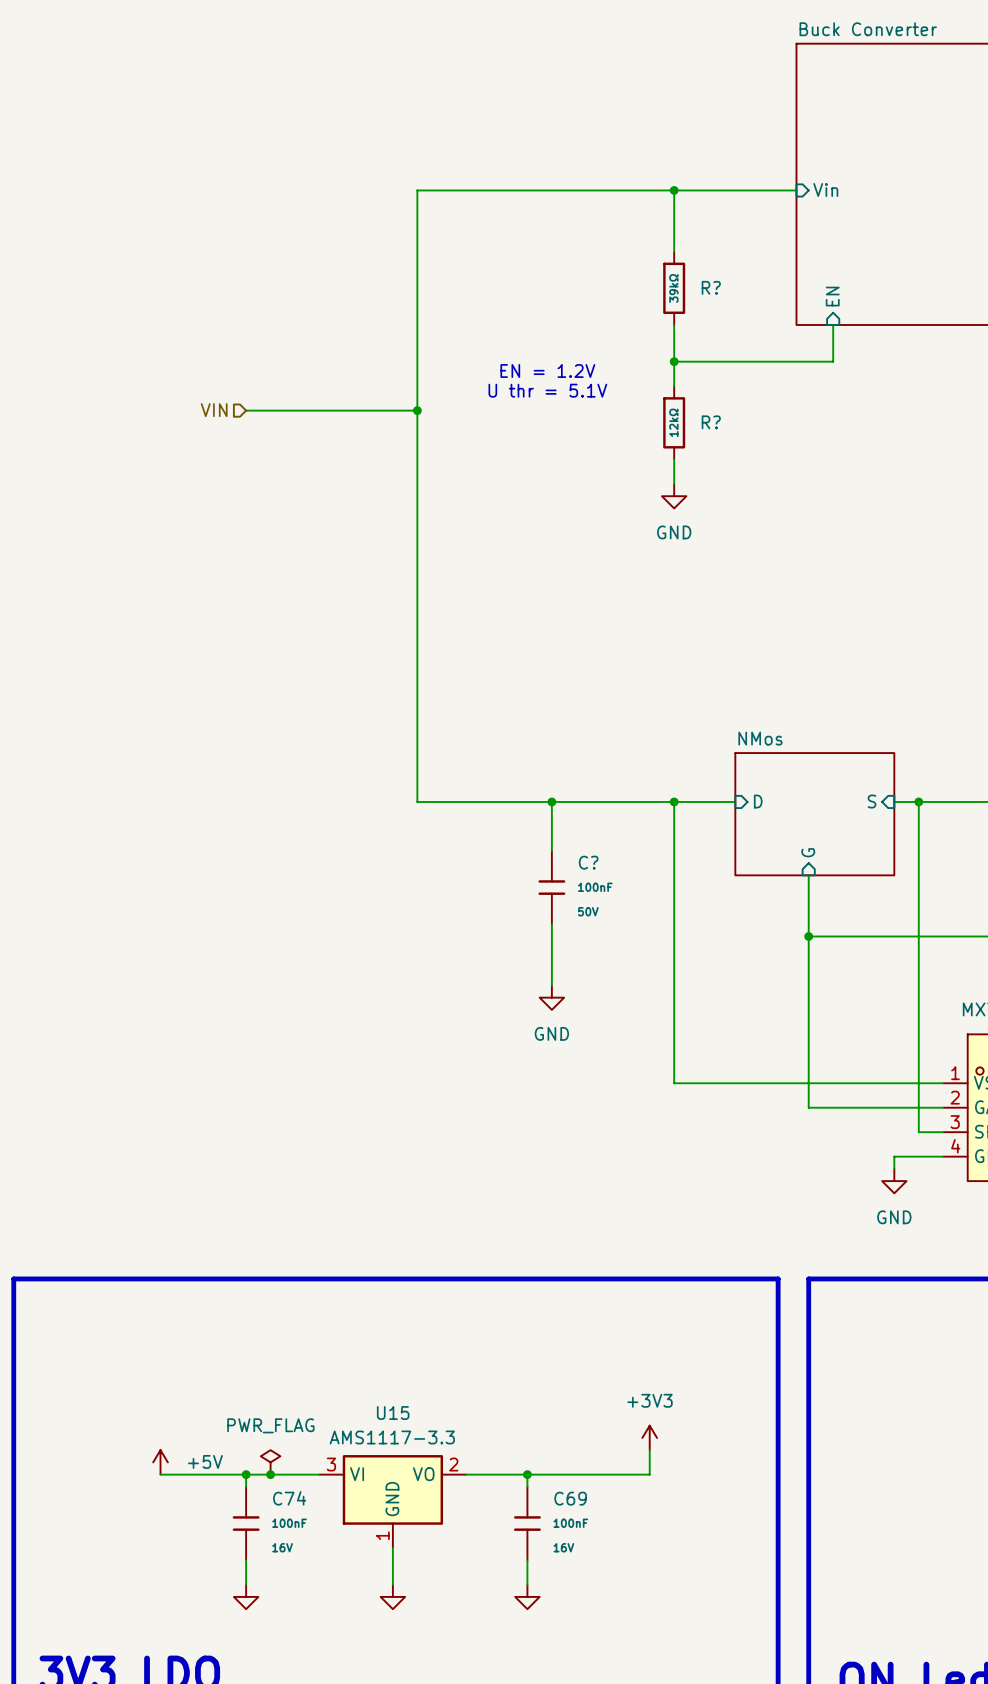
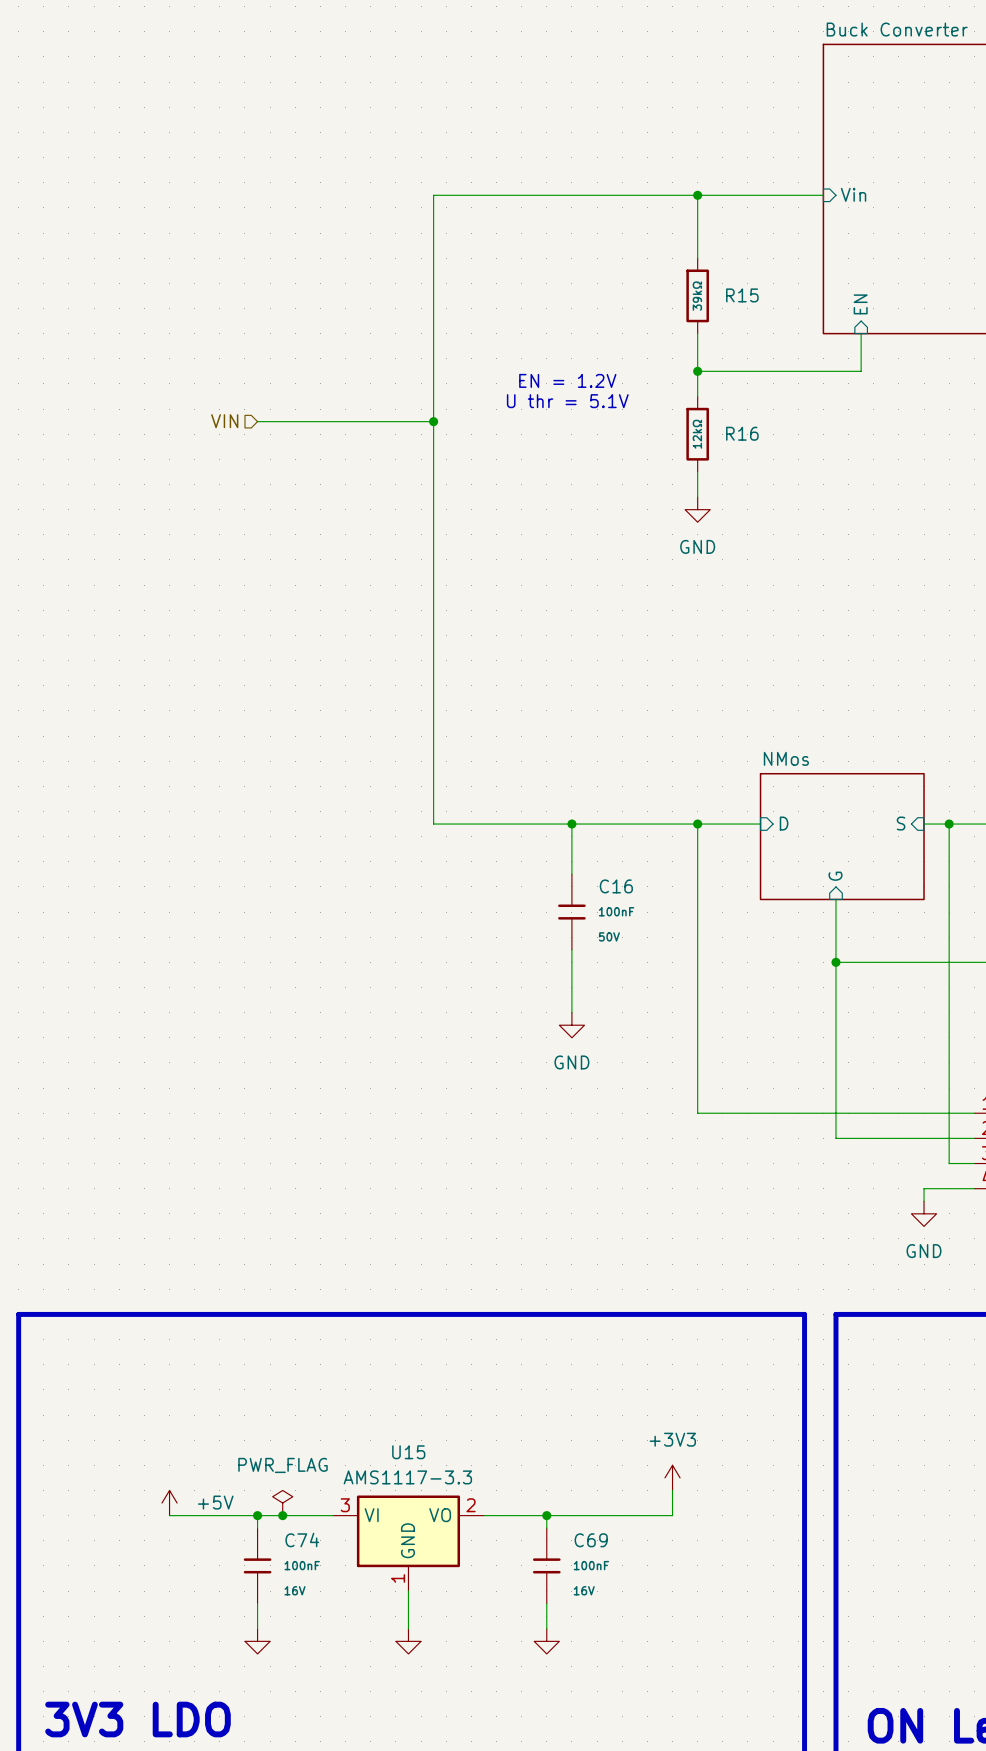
R? name: R? (711, 287) -> R15 (742, 295)
R? name: R? (711, 422) -> R16 (742, 433)
C? name: C? (588, 862) -> C16 (616, 886)

